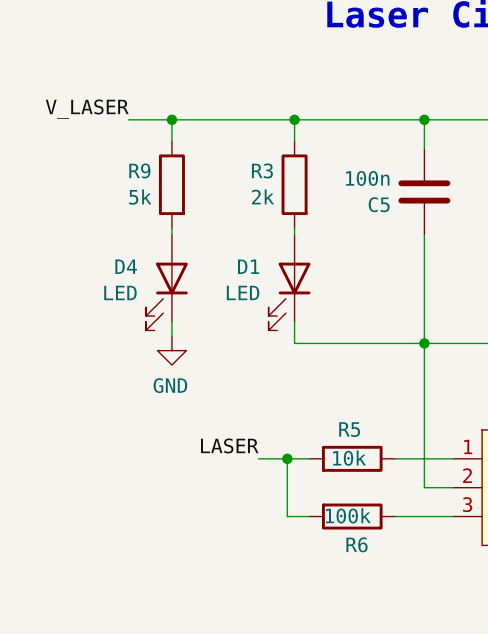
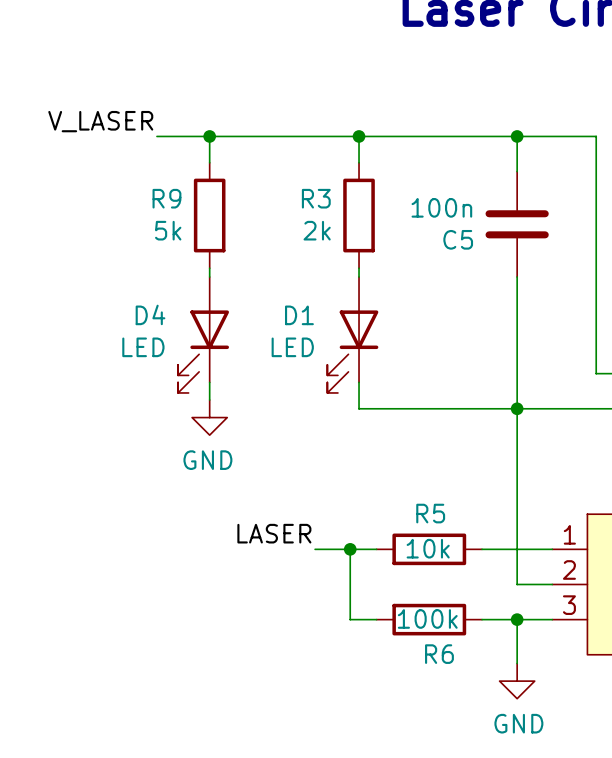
wire: none -> (517, 619) (517, 663)
junction: none -> (517, 619)
power symbol: none -> GND (517, 681)

